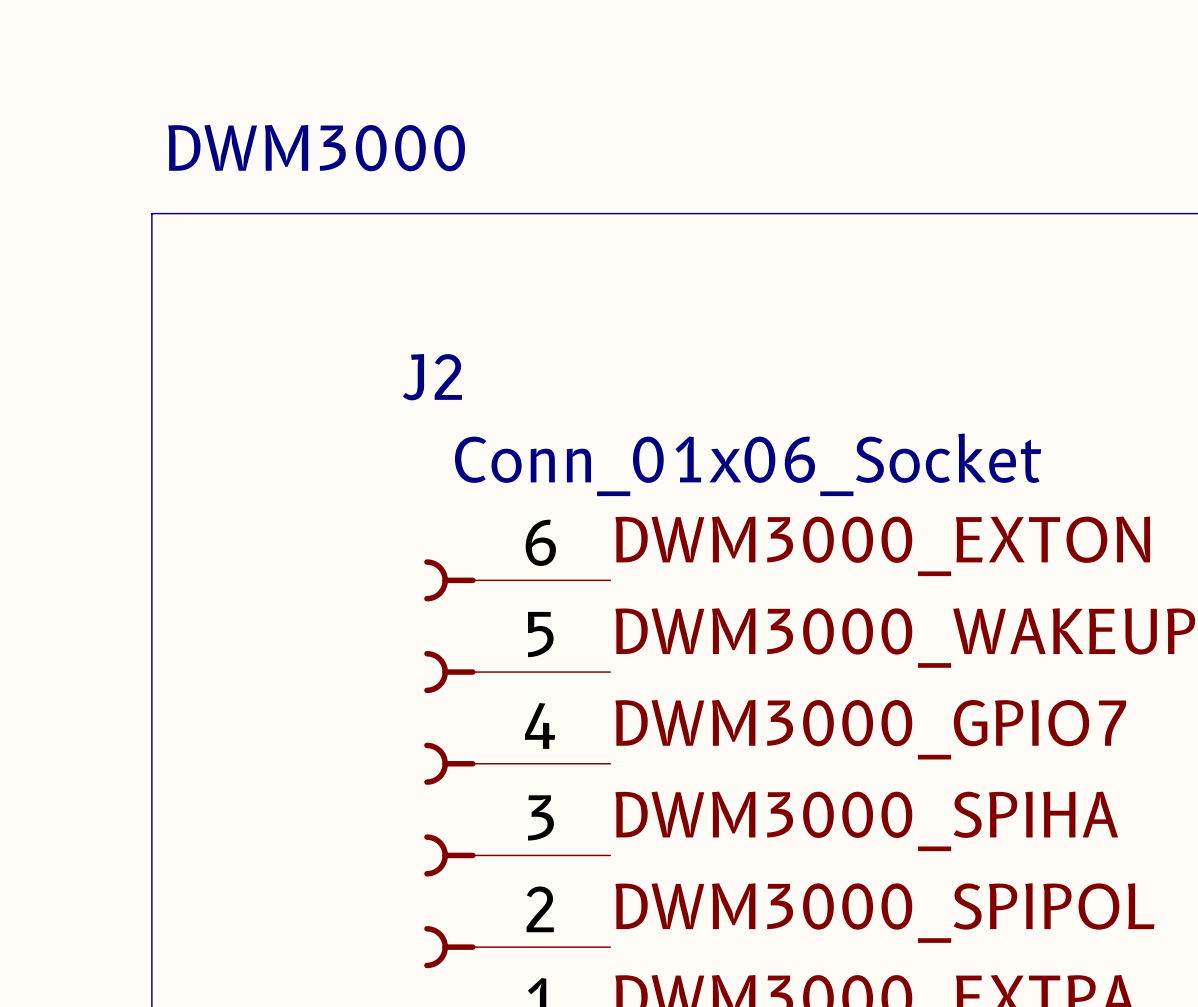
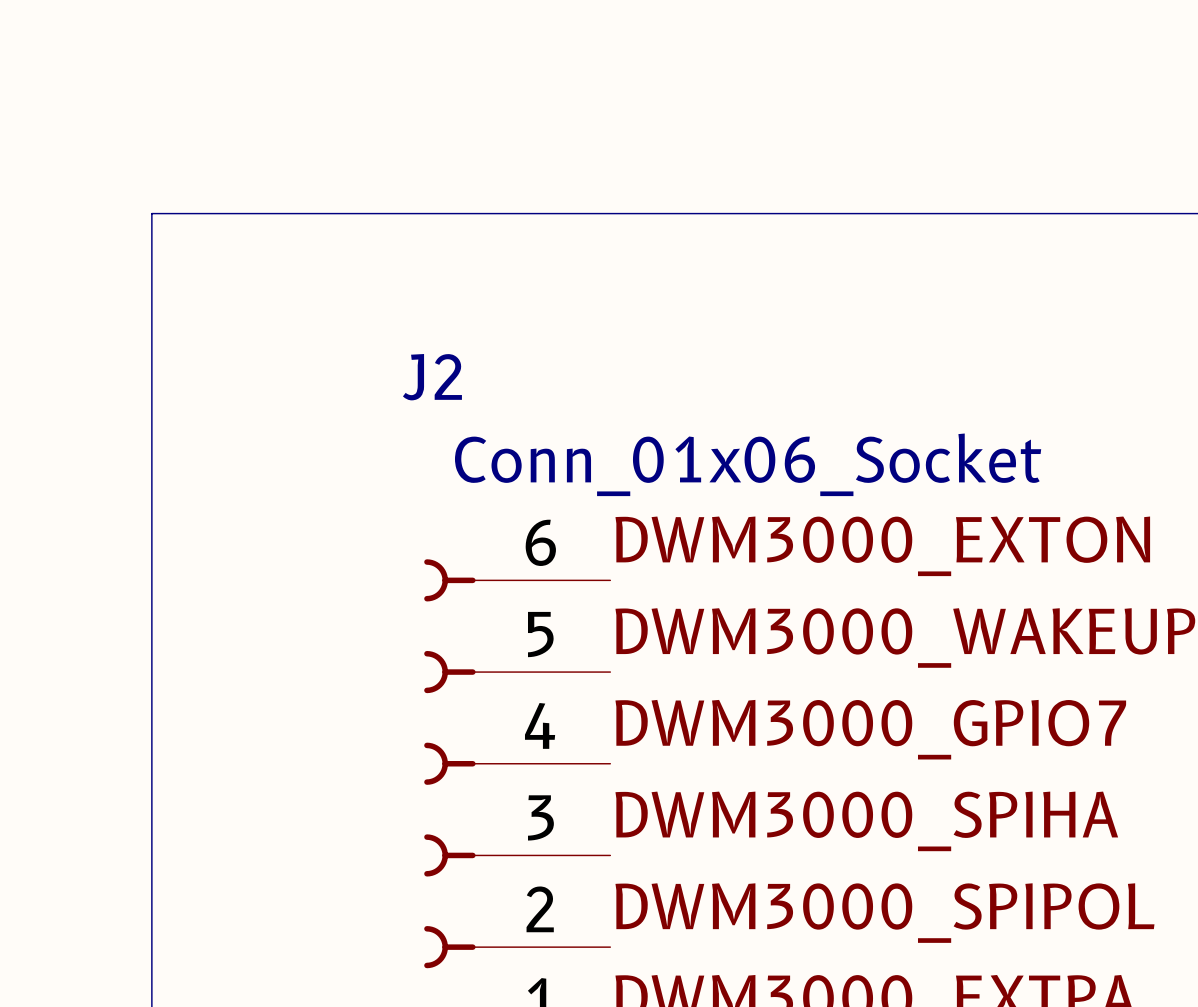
text: DWM3000 (316, 148) -> none

